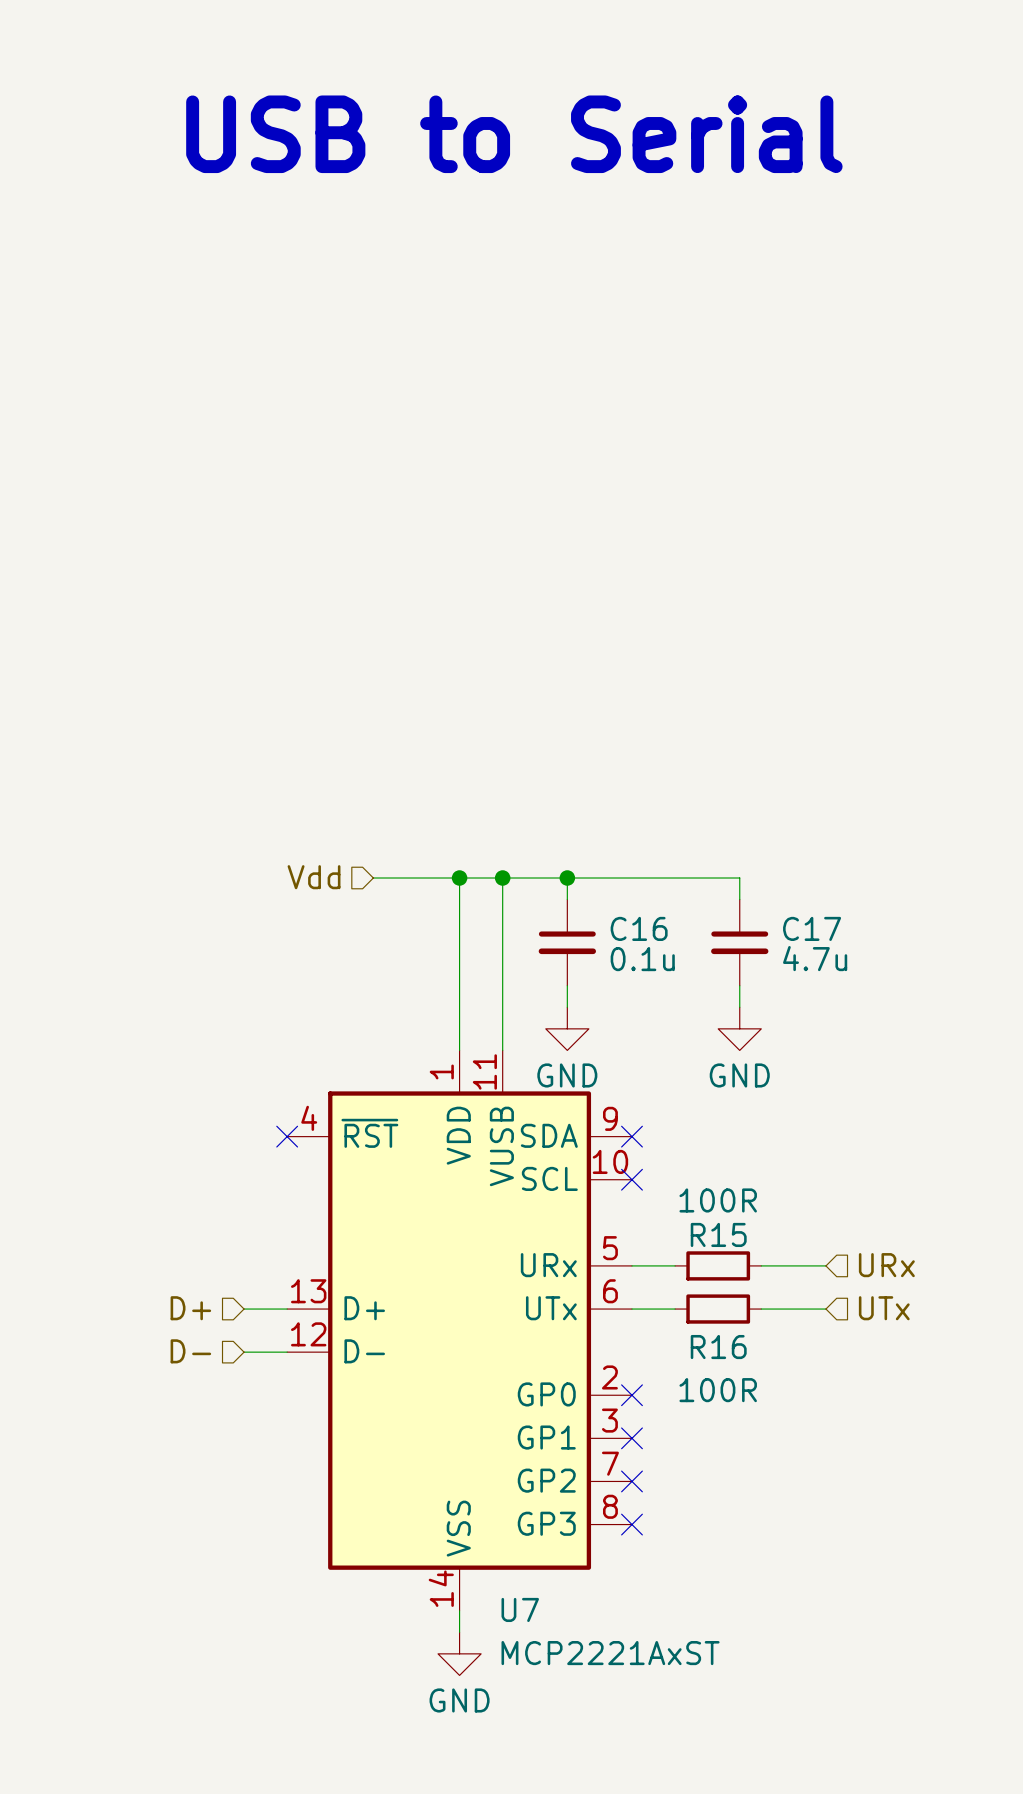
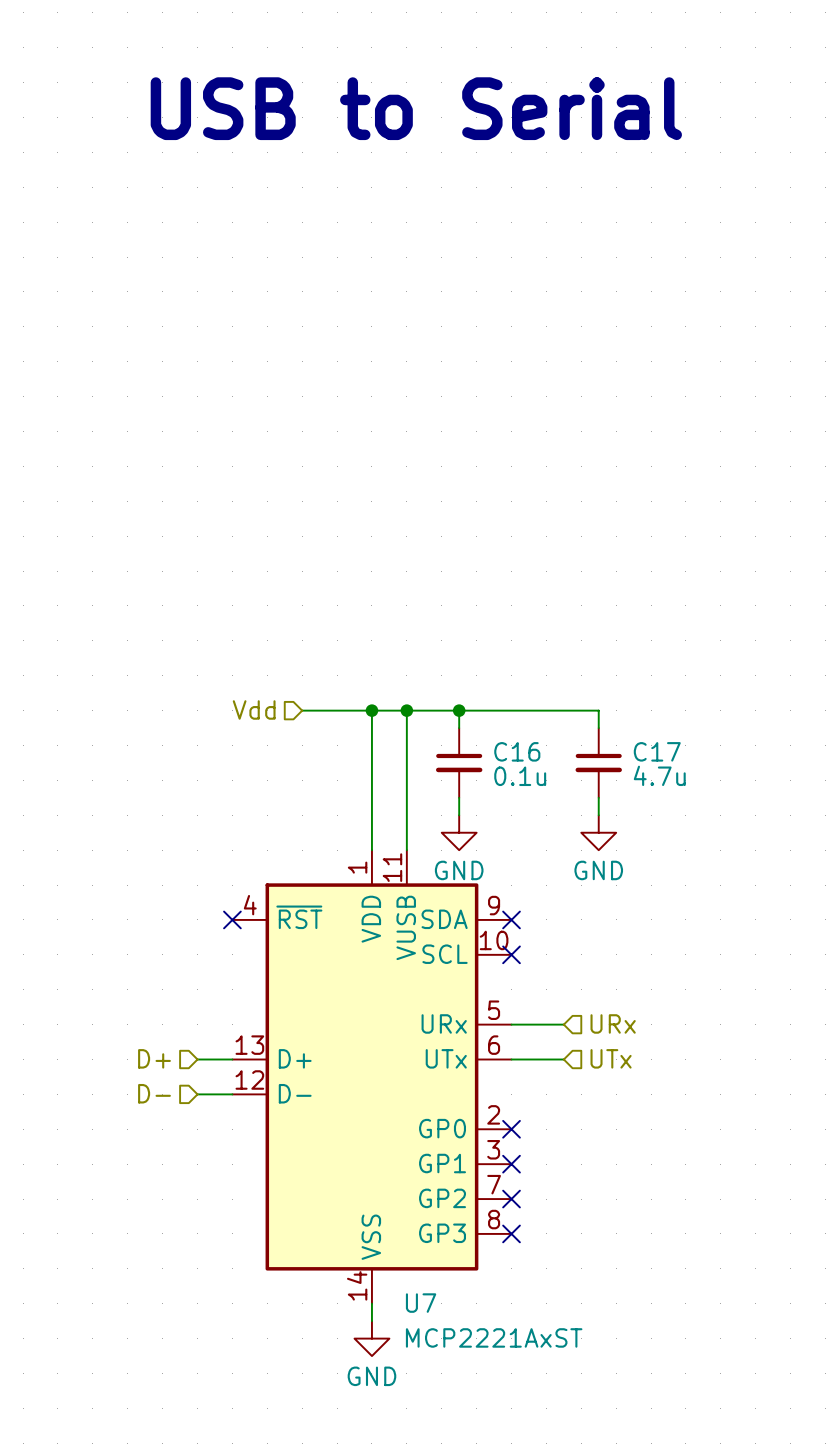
R15: 100R (718, 1265) -> none
wire: (761, 1265) (825, 1265) -> none
hierarchical label position: URx (886, 1265) -> URx (613, 1023)
hierarchical label position: UTx (884, 1308) -> UTx (611, 1058)
R16: 100R (718, 1309) -> none
wire: (761, 1309) (825, 1309) -> none

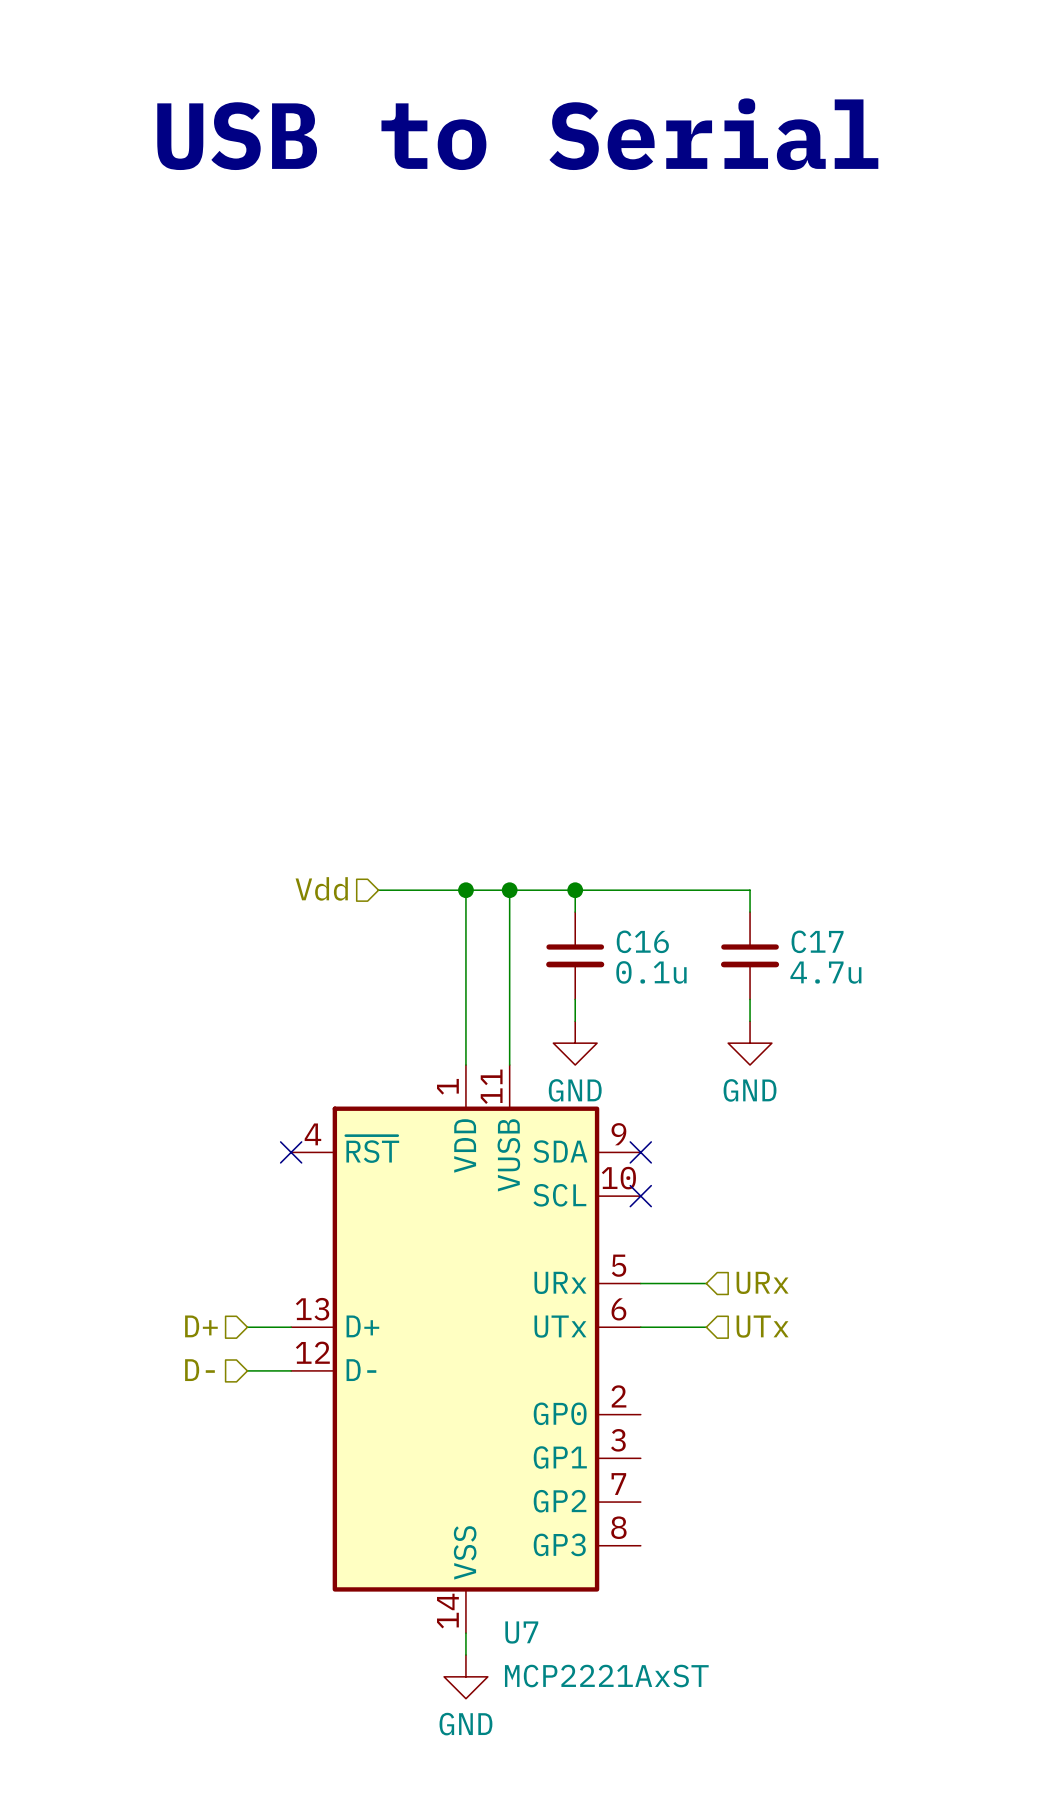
no-connect mark: (511, 1129) -> none
no-connect mark: (511, 1164) -> none
no-connect mark: (511, 1199) -> none
no-connect mark: (511, 1233) -> none

